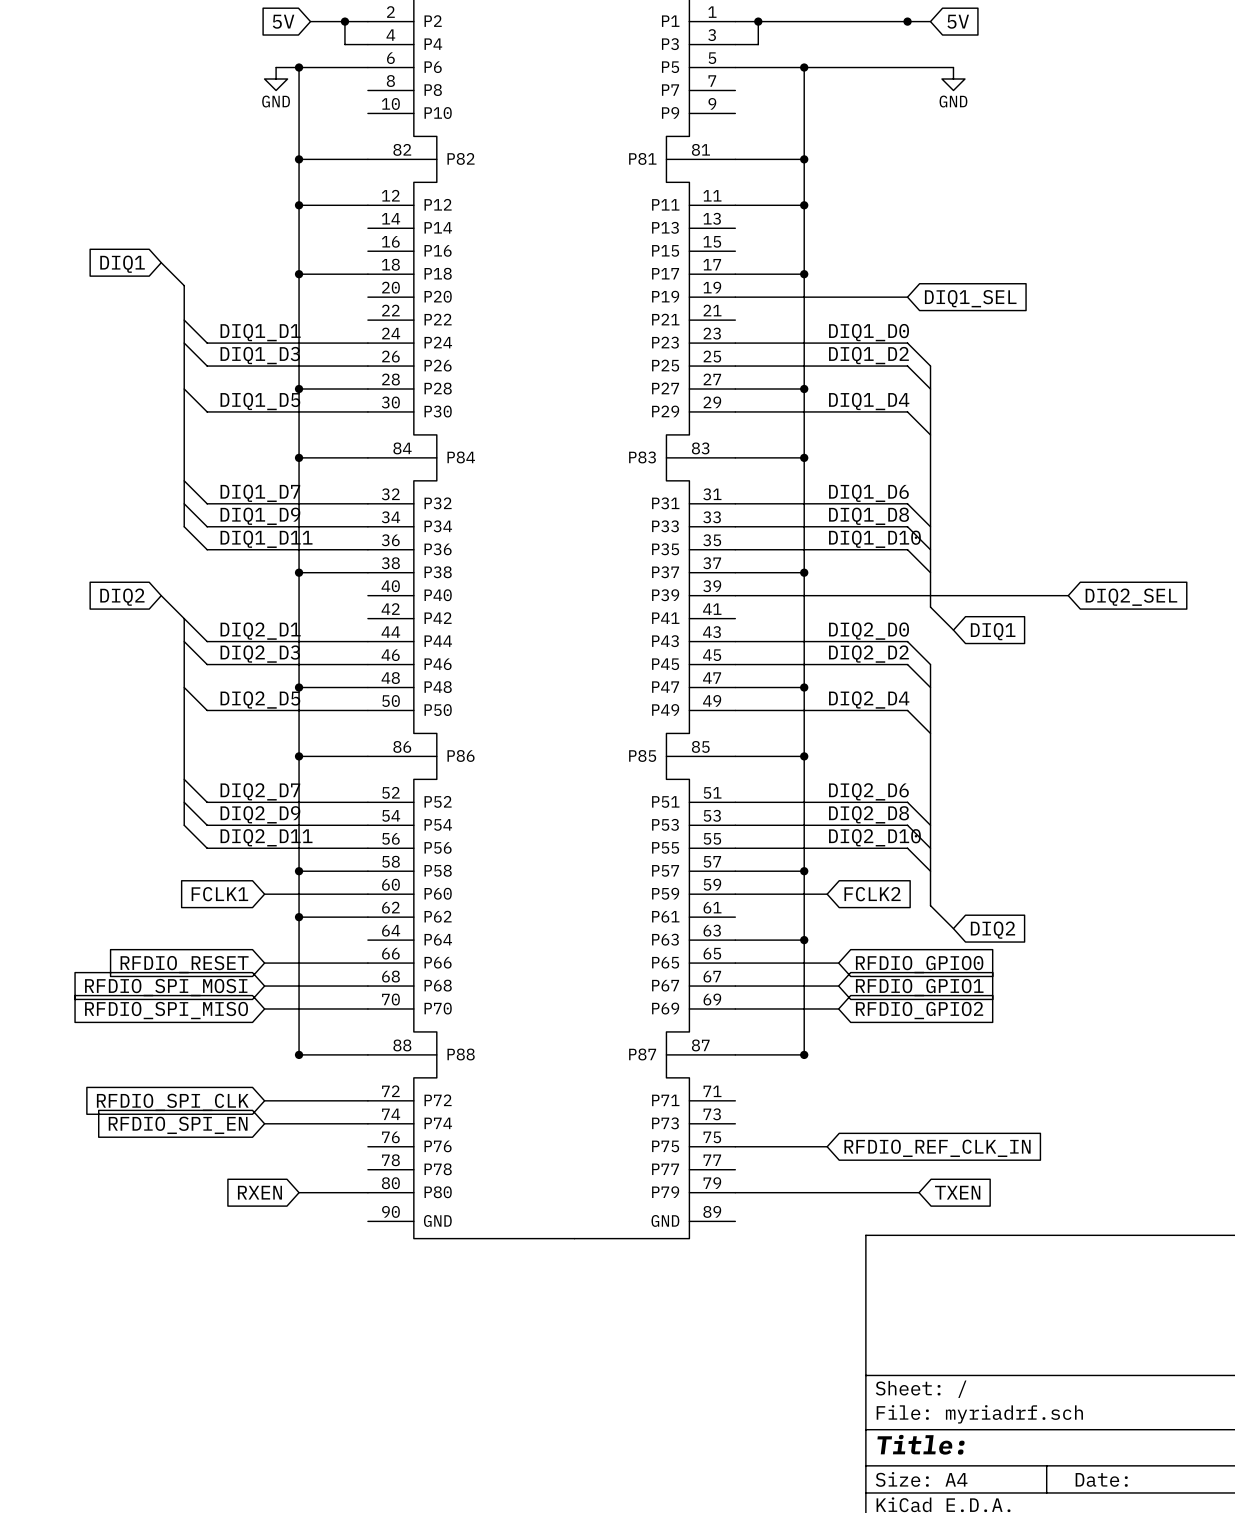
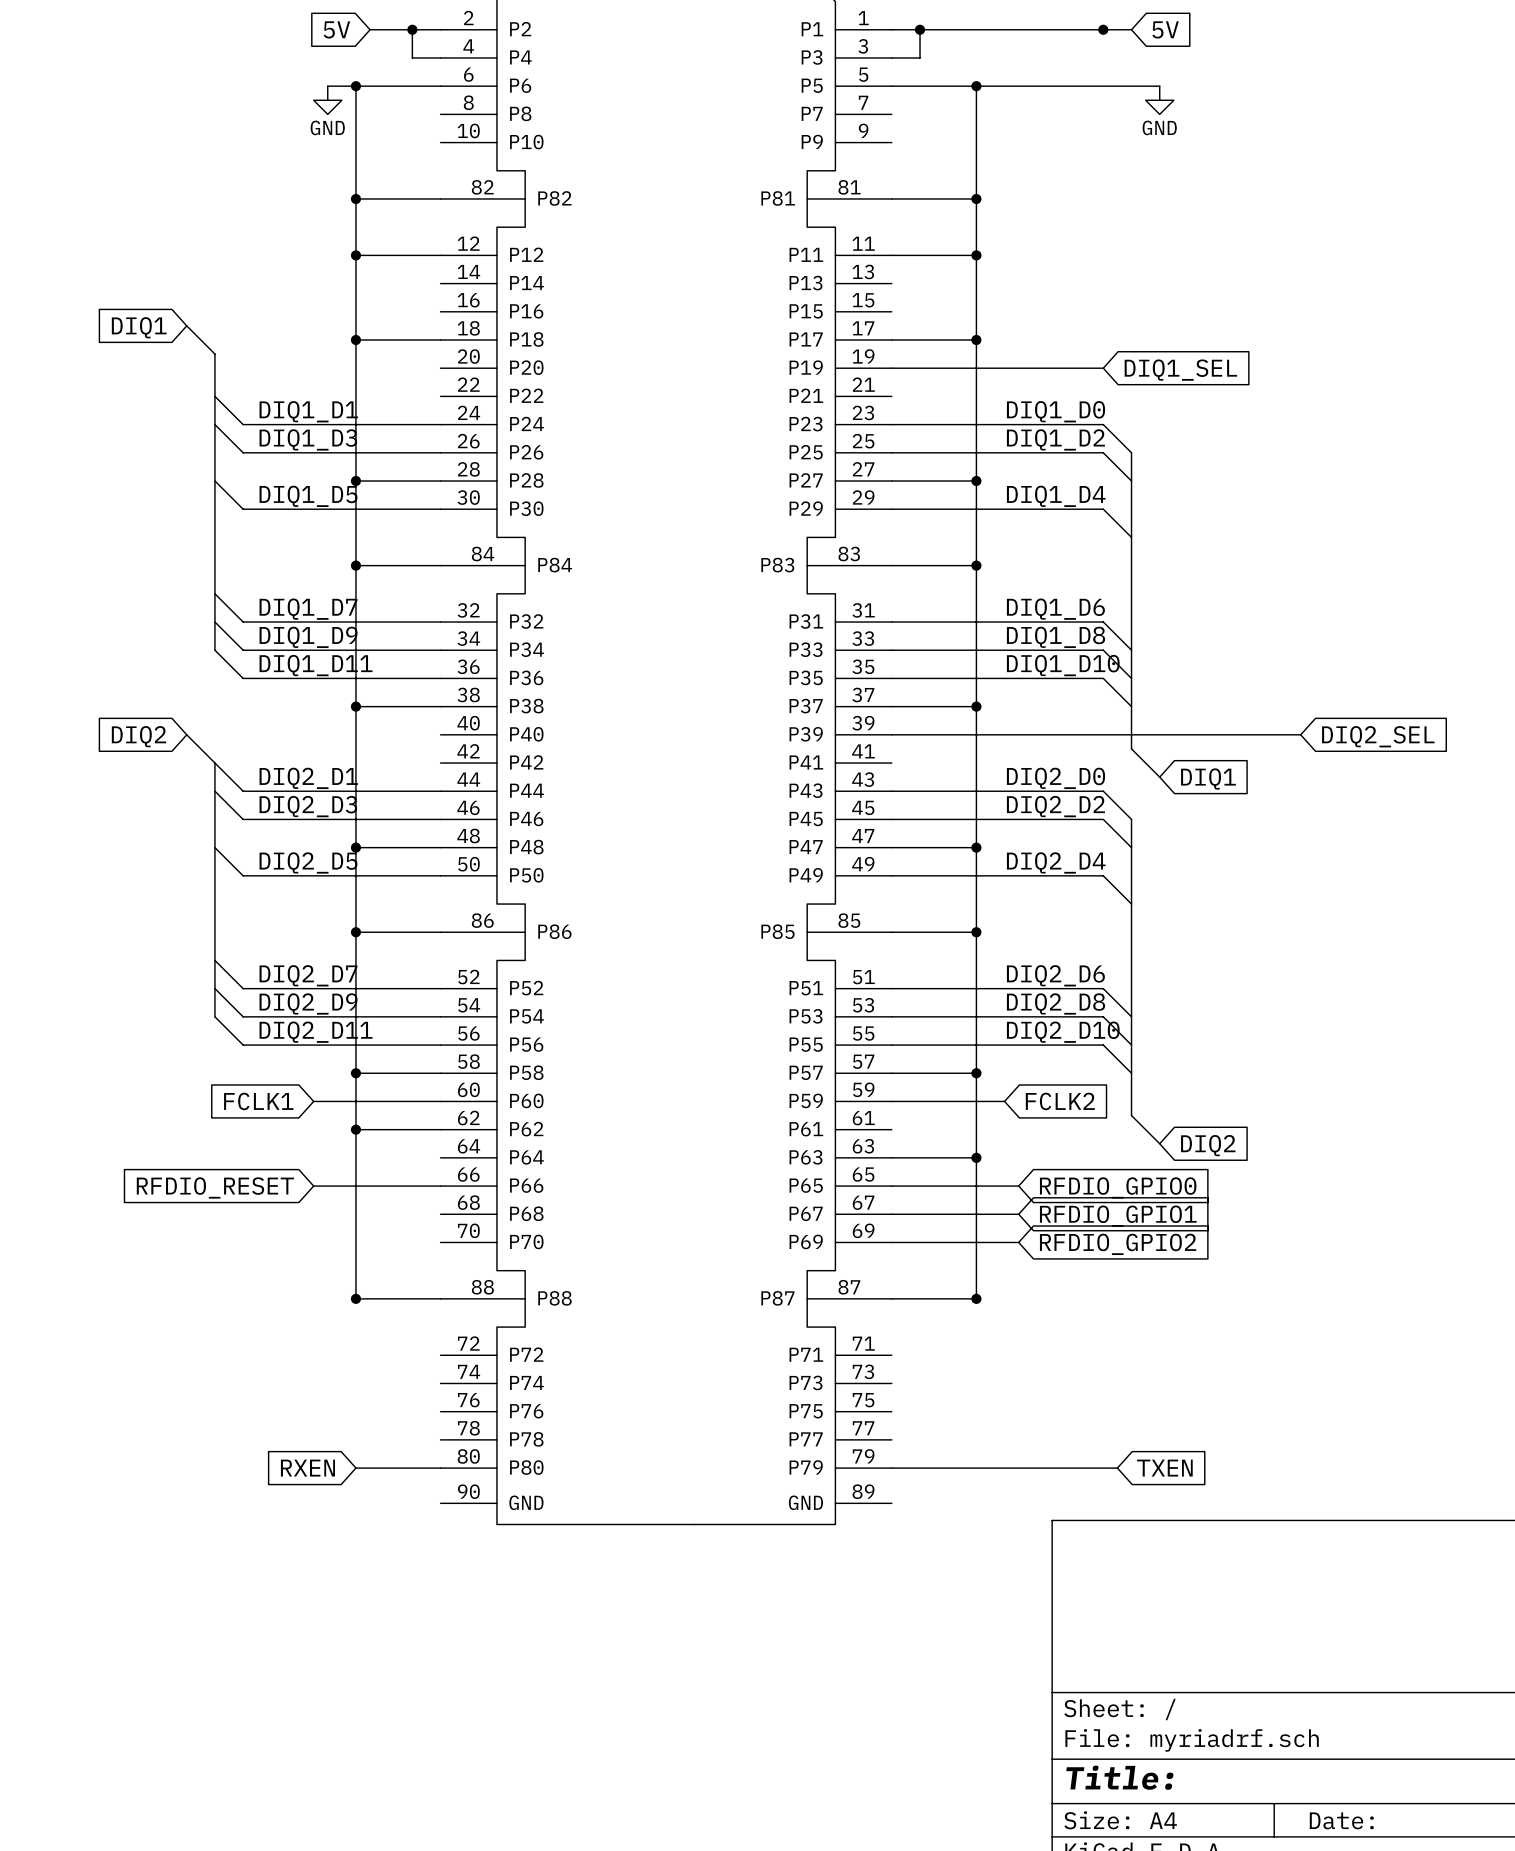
wire: (264, 986) (367, 986) -> none
global label: RFDIO_SPI_MOSI (166, 987) -> none
wire: (264, 1008) (367, 1008) -> none
global label: RFDIO_SPI_MISO (166, 1010) -> none
wire: (264, 1100) (367, 1100) -> none
global label: RFDIO_SPI_CLK (172, 1102) -> none
wire: (264, 1123) (367, 1123) -> none
global label: RFDIO_SPI_EN (178, 1125) -> none
wire: (735, 1146) (827, 1146) -> none
global label: RFDIO_REF_CLK_IN (937, 1148) -> none

